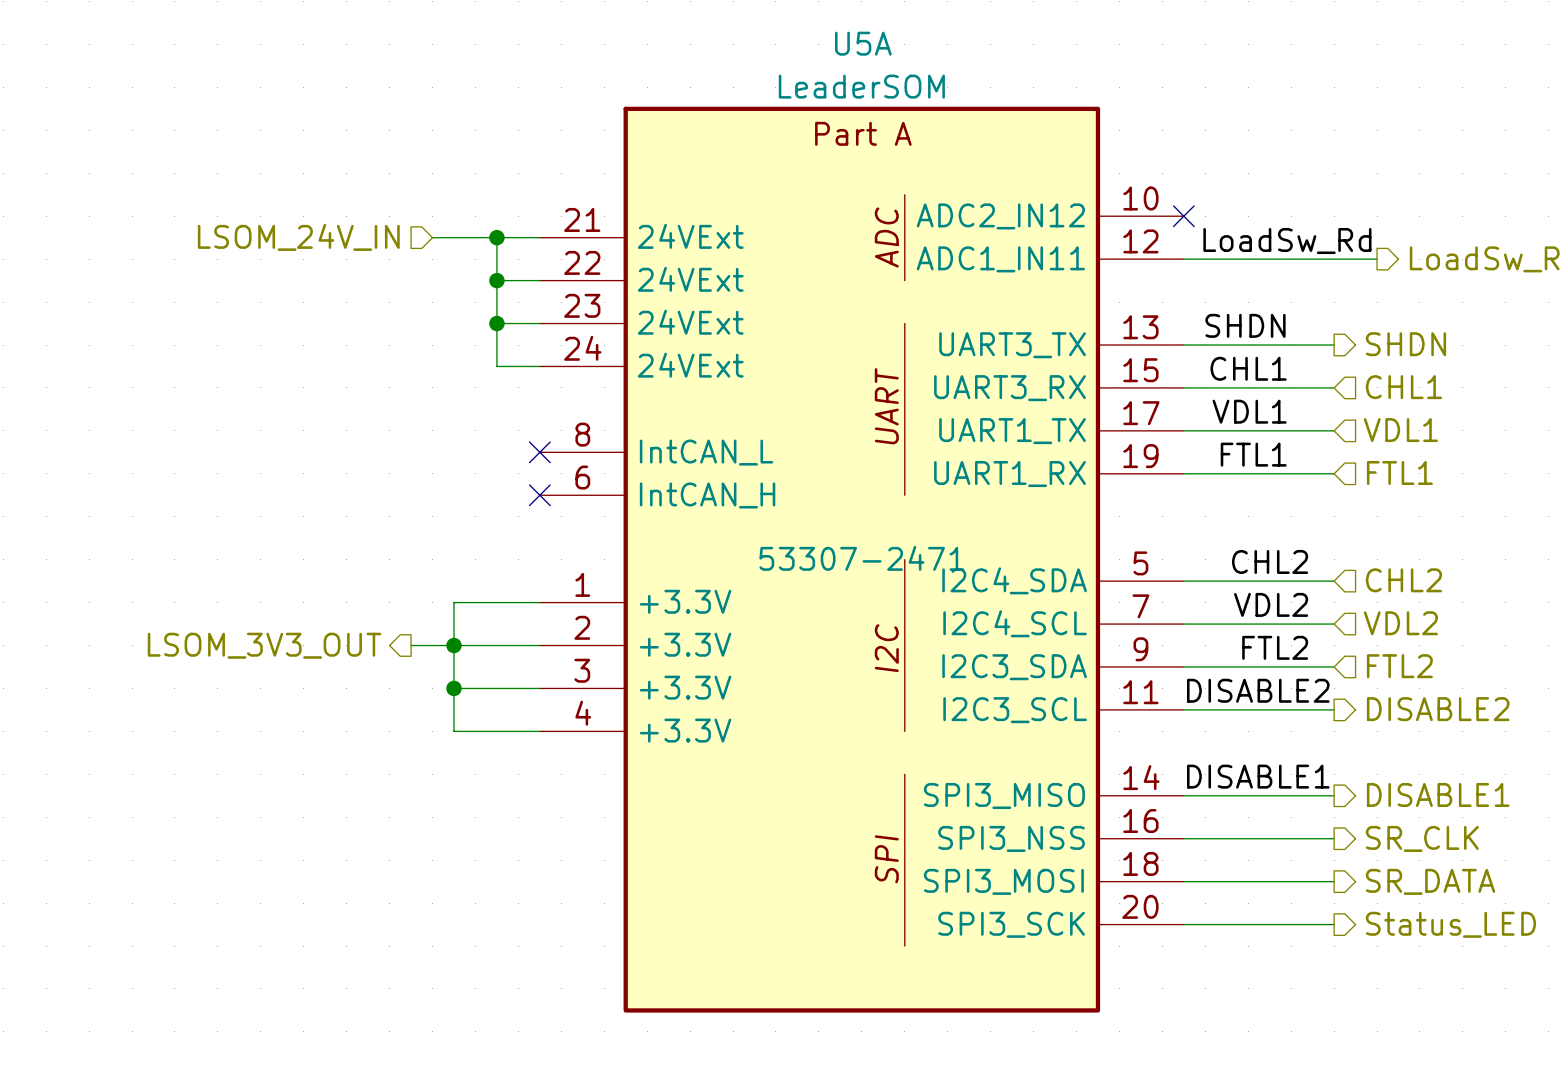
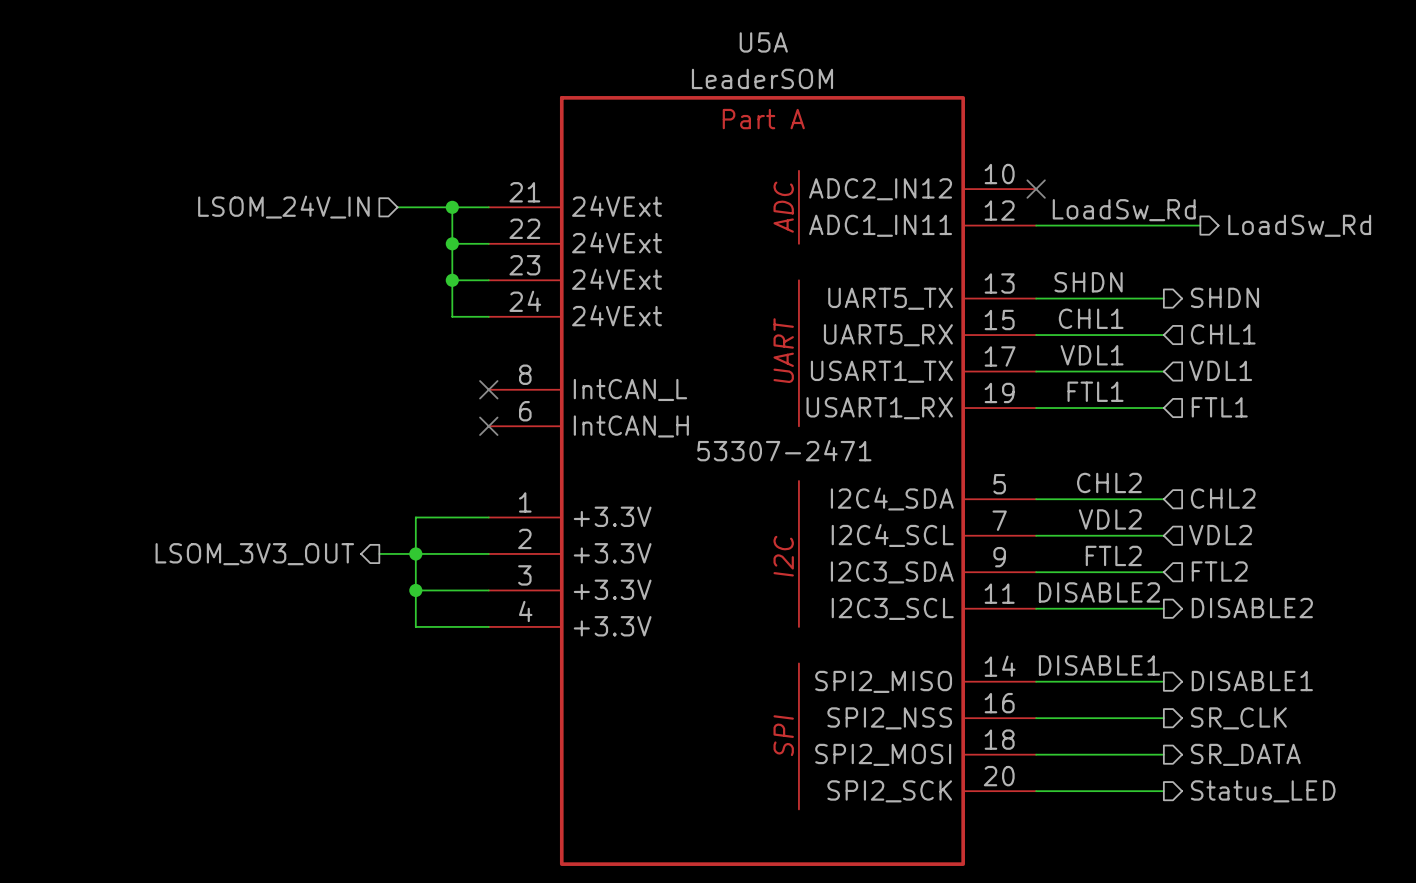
U5A pin name: UART3_TX (1012, 345) -> UART5_TX (890, 298)
U5A pin name: UART3_RX (1010, 388) -> UART5_RX (888, 335)
U5A pin name: UART1_TX (1012, 431) -> USART1_TX (881, 371)
U5A pin name: UART1_RX (1010, 474) -> USART1_RX (879, 408)
U5A text position: 53307-2471 (861, 558) -> 53307-2471 (784, 450)
U5A pin name: SPI3_MISO (1004, 796) -> SPI2_MISO (883, 681)
U5A pin name: SPI3_NSS (1011, 838) -> SPI2_NSS (889, 718)
U5A pin name: SPI3_MOSI (1003, 881) -> SPI2_MOSI (883, 754)
U5A pin name: SPI3_SCK (1011, 924) -> SPI2_SCK (889, 791)

